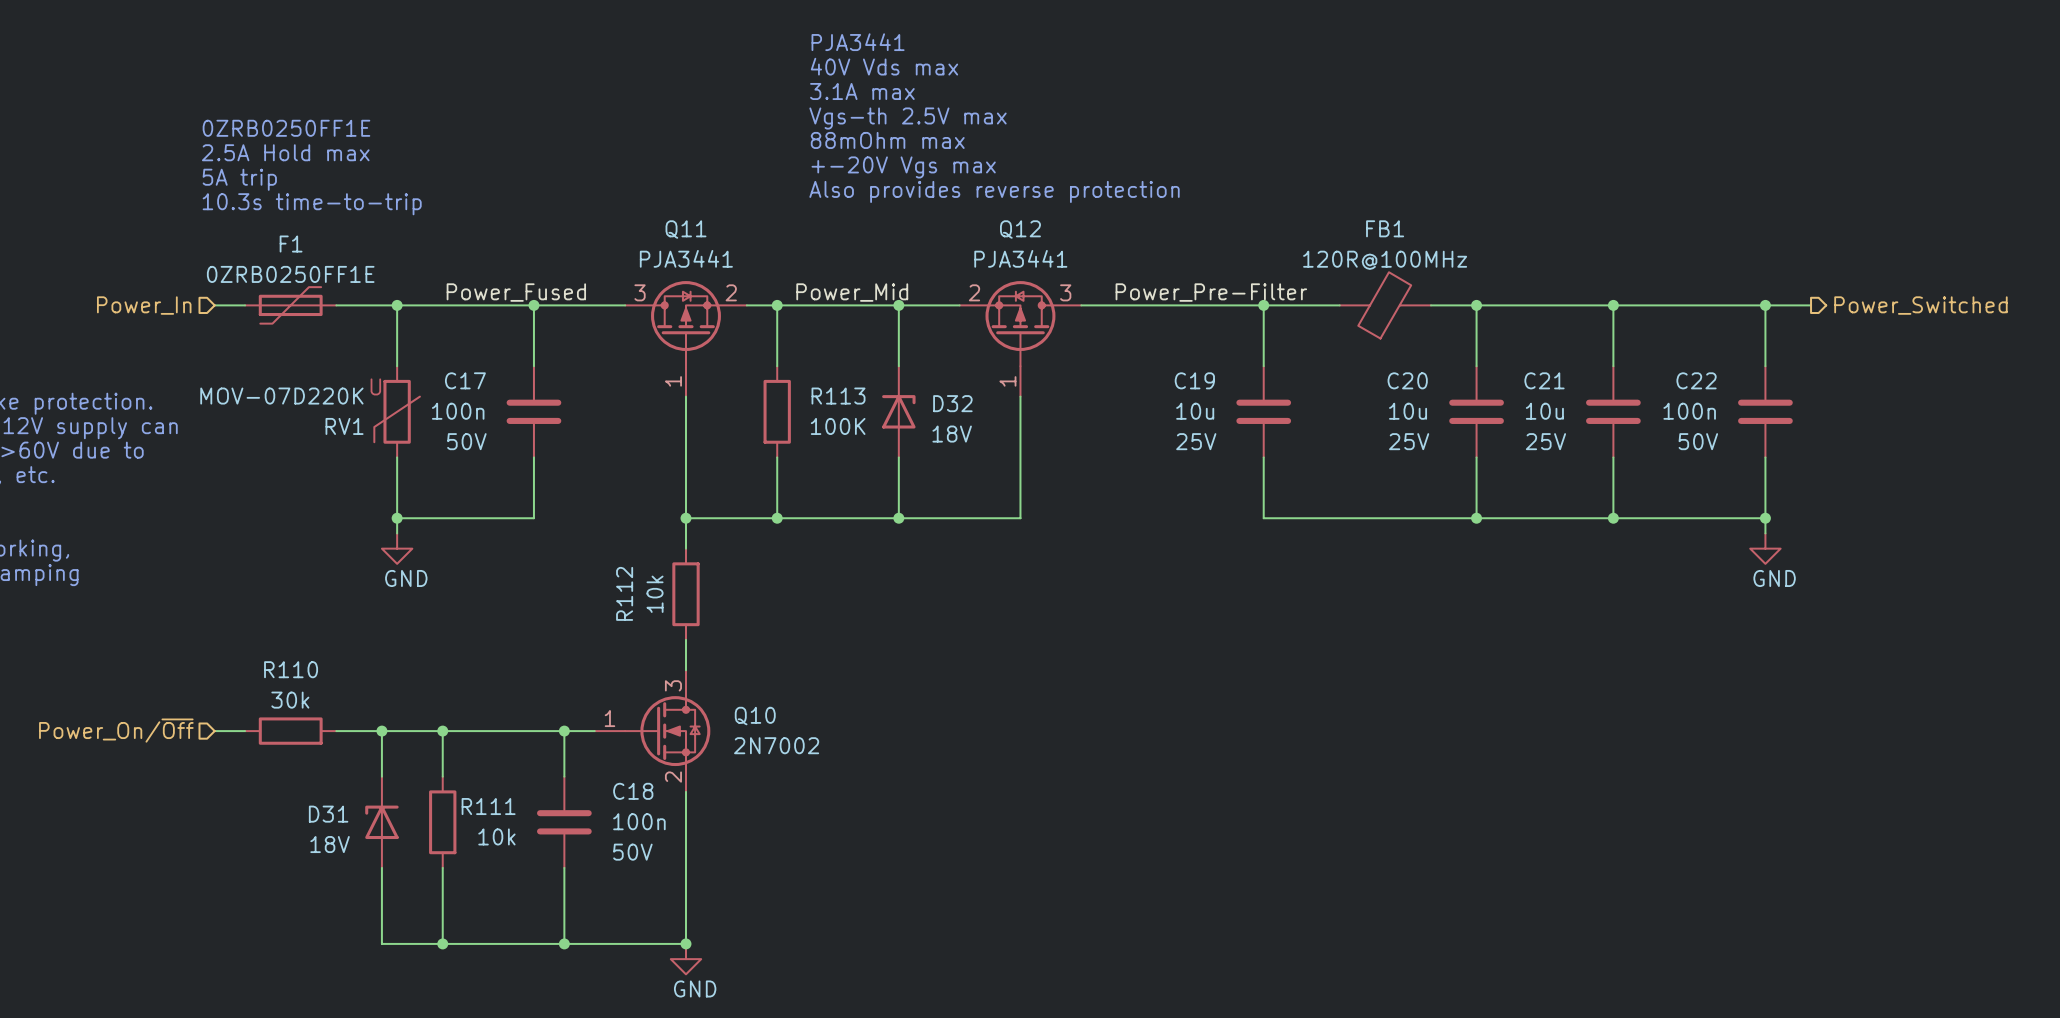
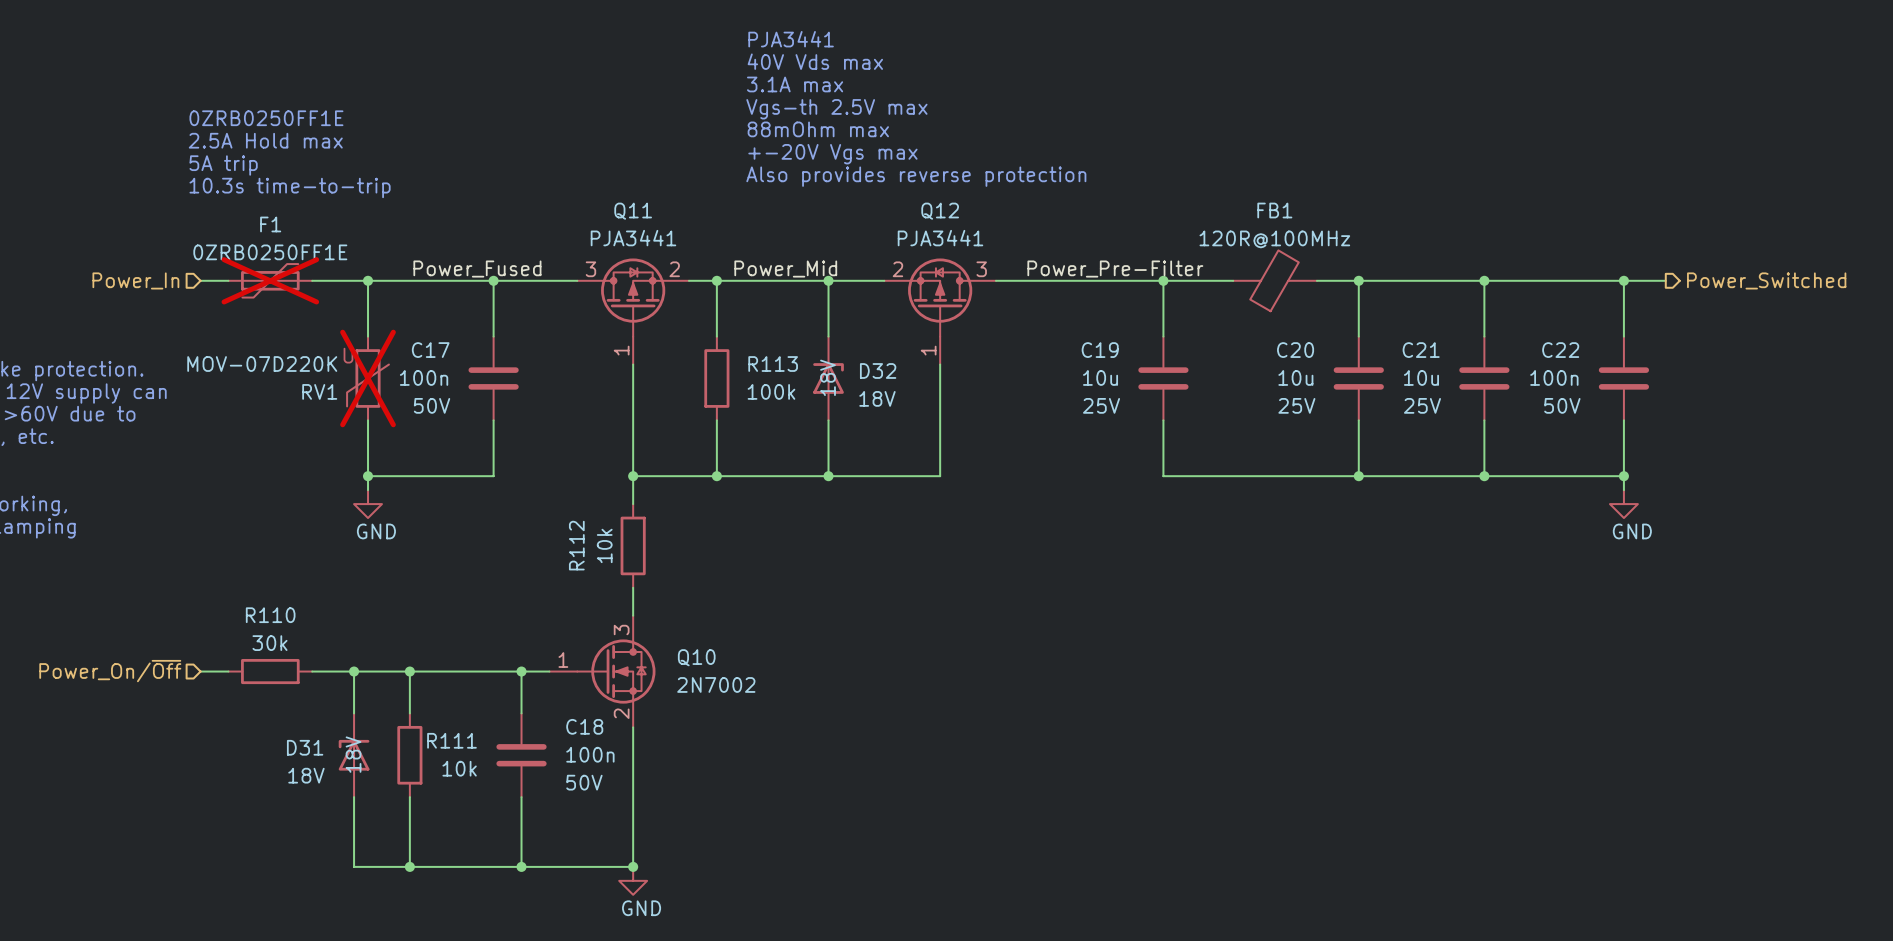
F1 do-not-place cross: none -> (270, 280)
RV1 do-not-place cross: none -> (368, 378)
D32 text: none -> 18V (827, 377)
R113 value: 100K (838, 426) -> 100k (771, 391)
D31 text: none -> 18V (353, 754)

